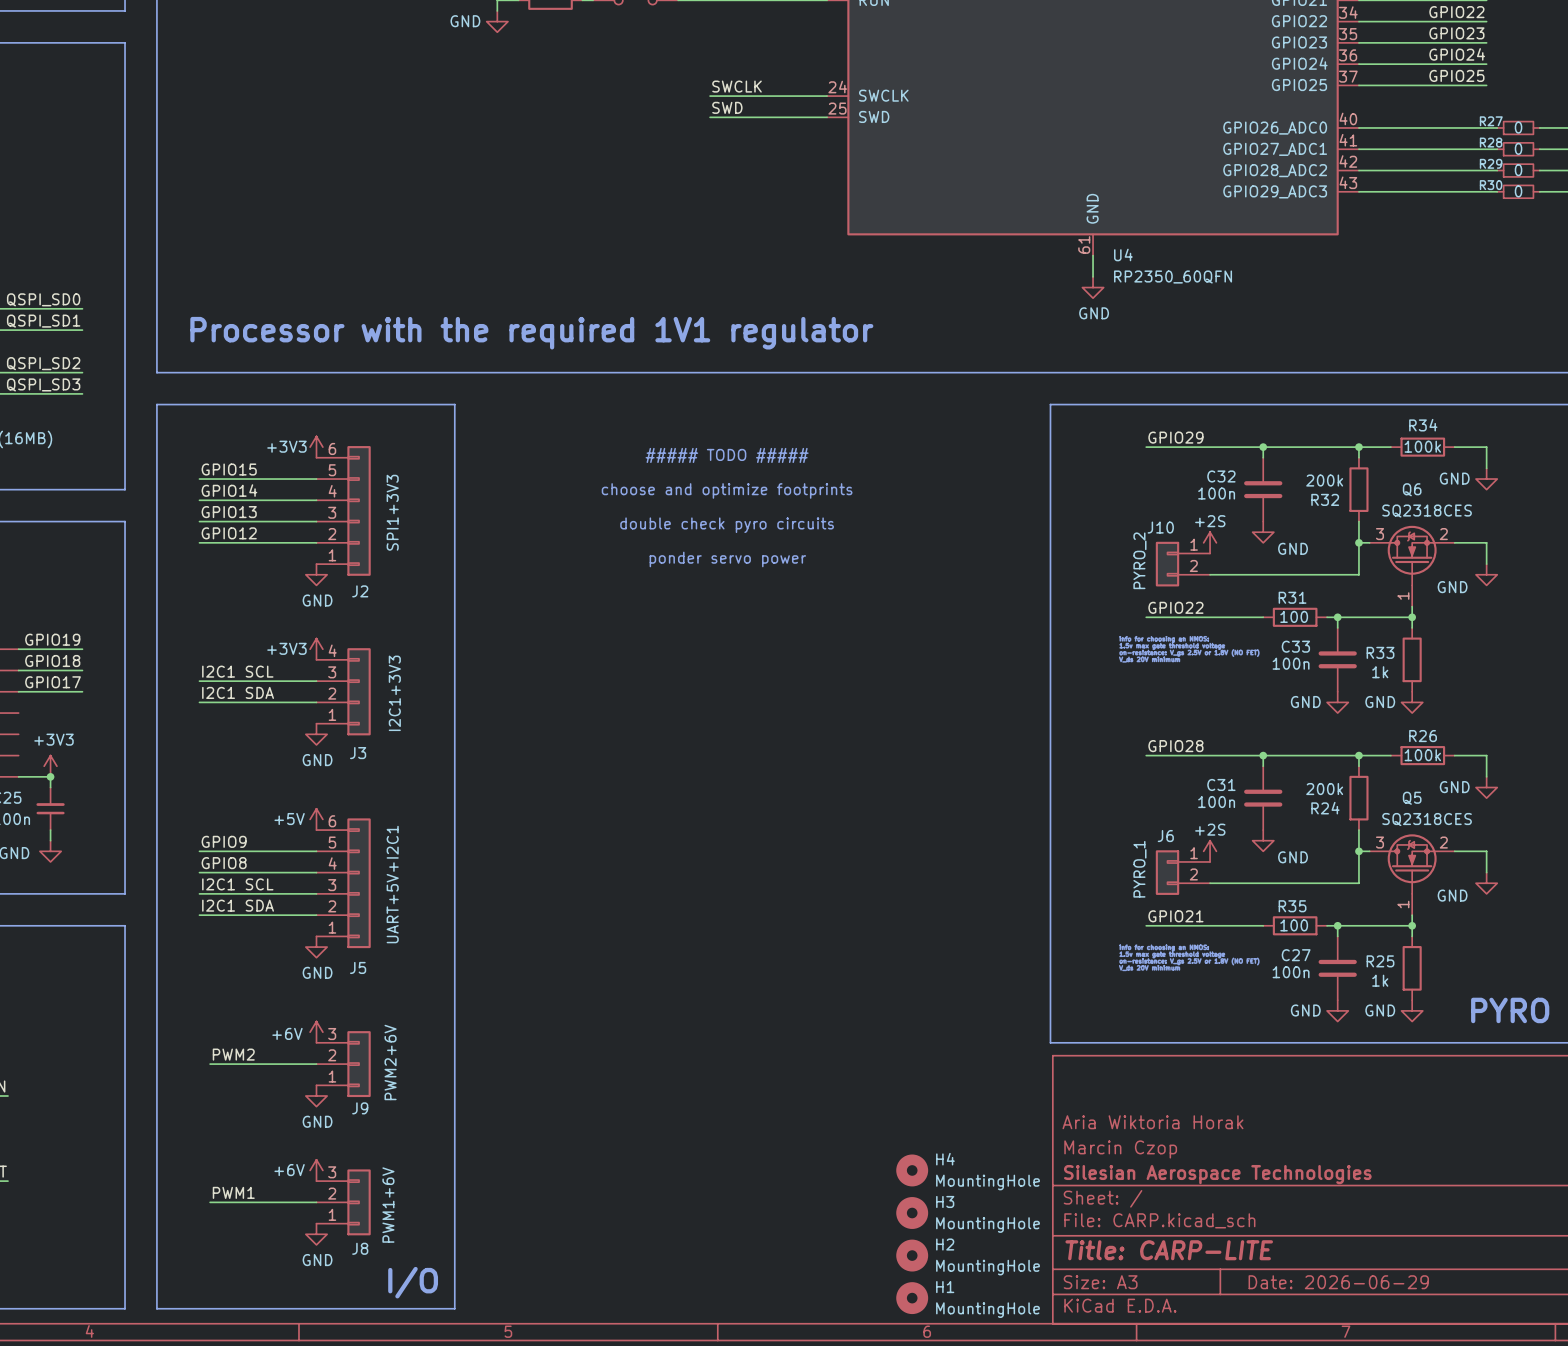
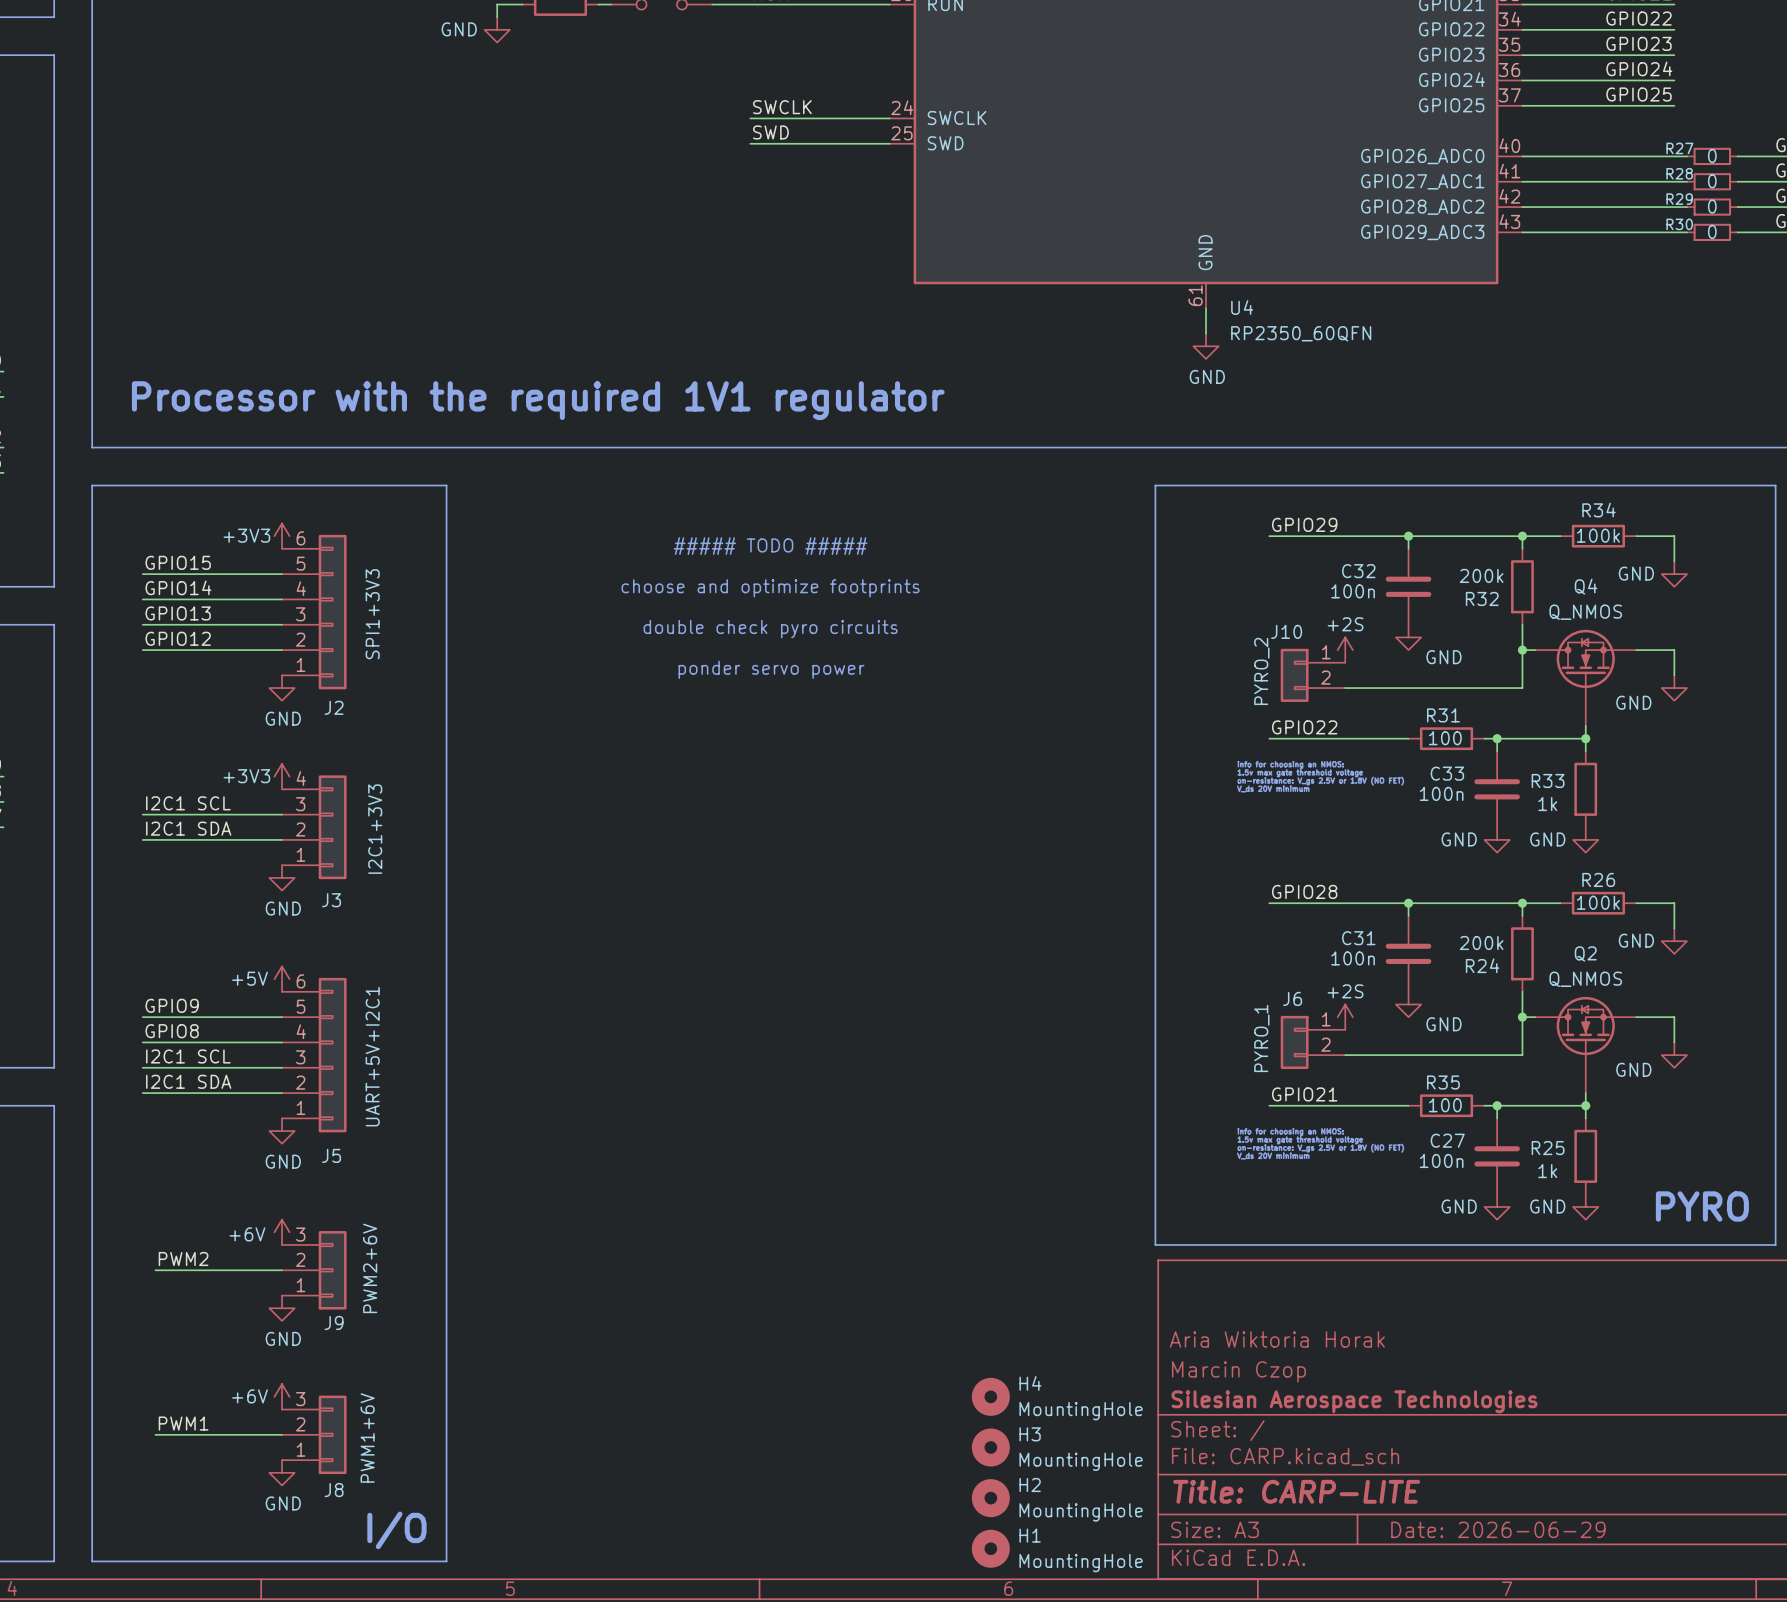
Q6: SQ2318CES (1412, 566) -> none
Q4: none -> Q_NMOS (1585, 677)
Q5: SQ2318CES (1412, 874) -> none
Q2: none -> Q_NMOS (1585, 1044)

